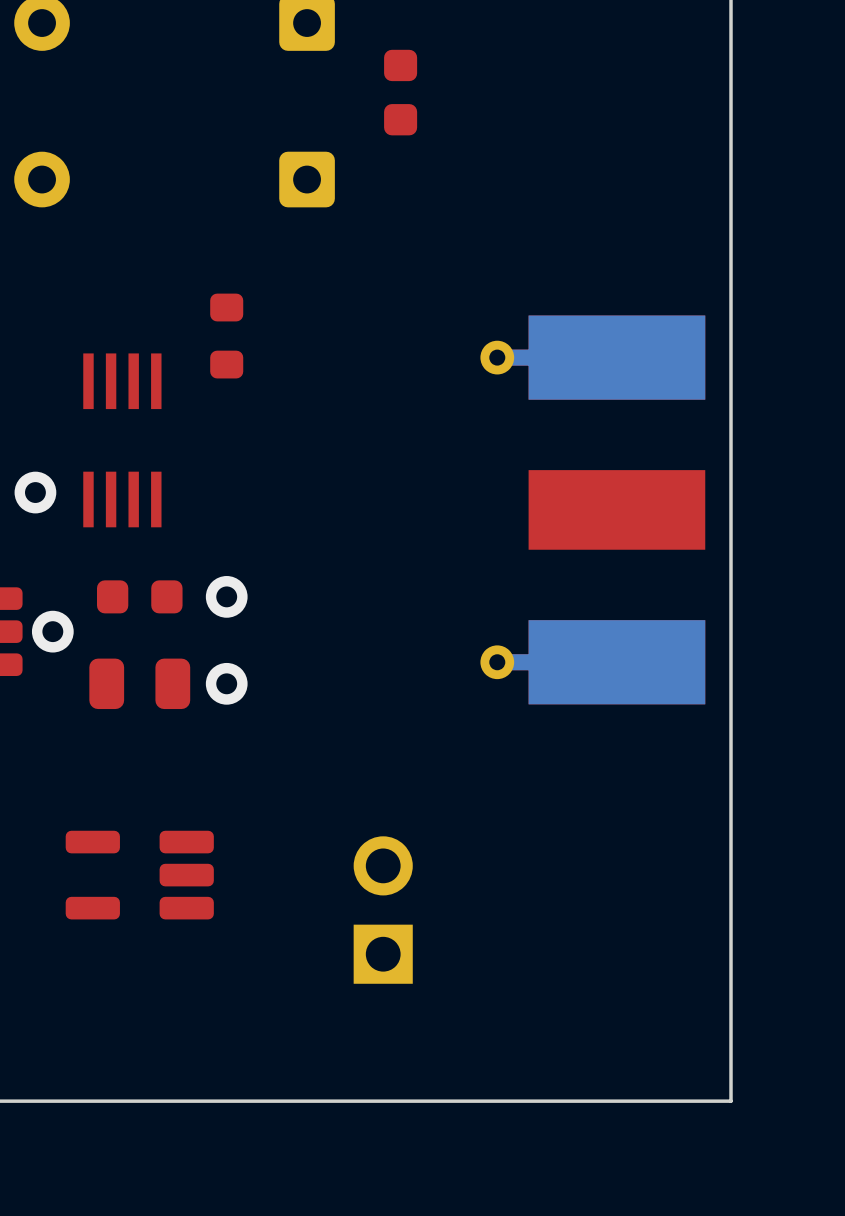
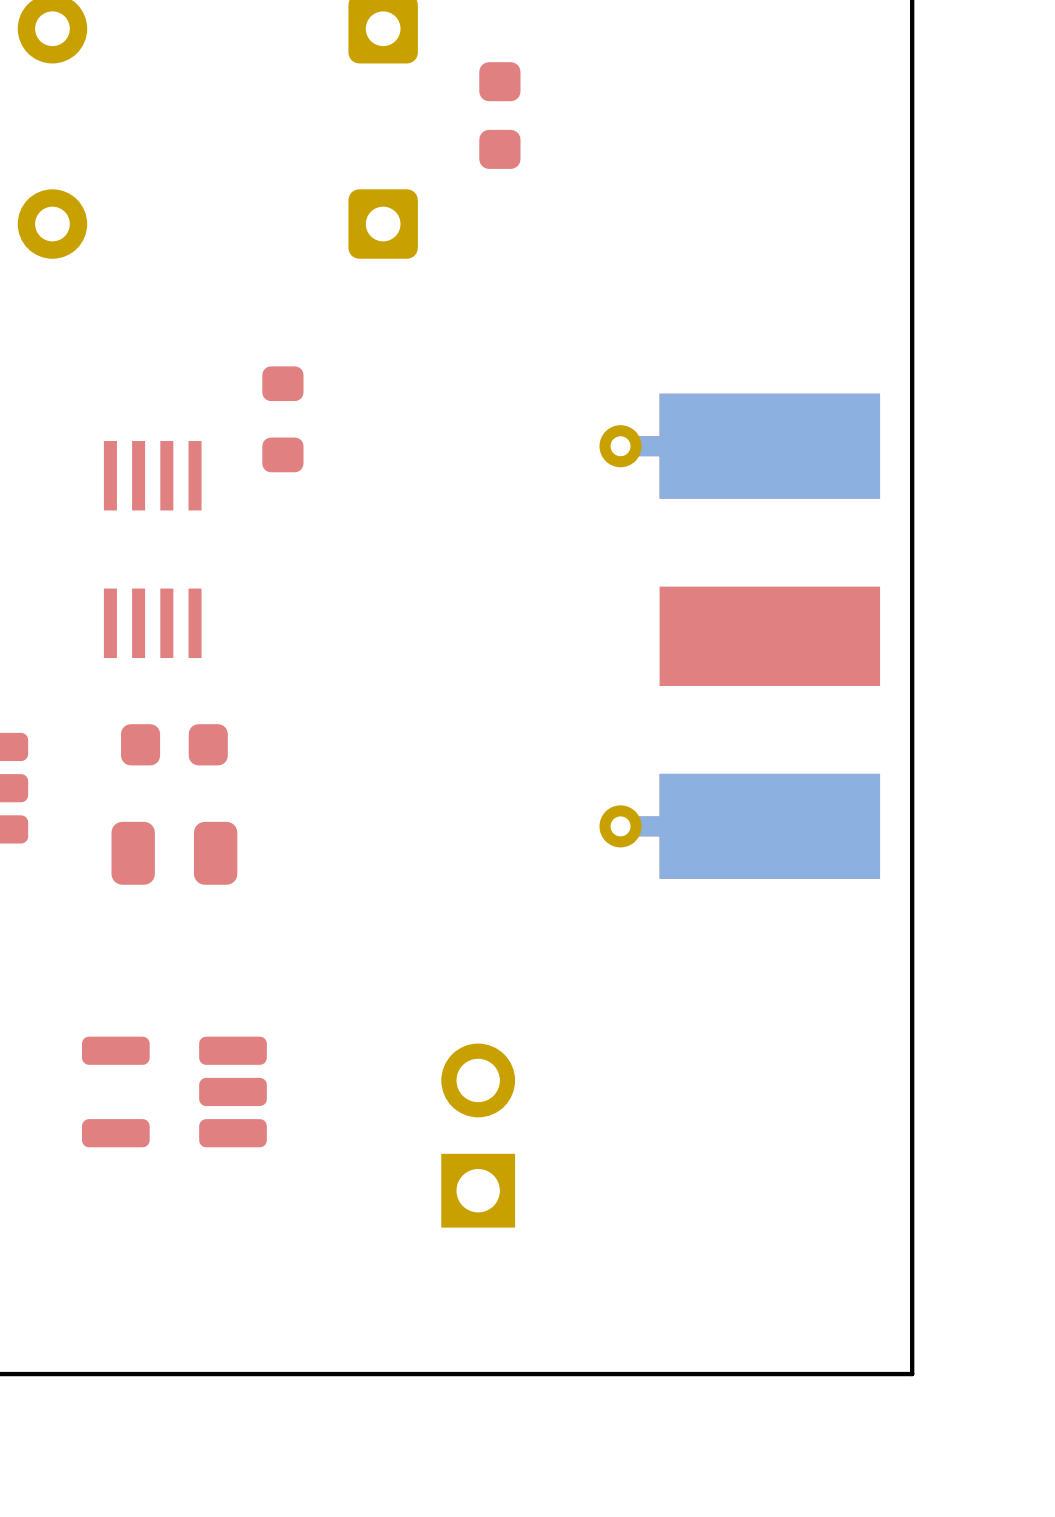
via: (35, 492) -> none
via: (226, 596) -> none
via: (52, 631) -> none
via: (226, 683) -> none

